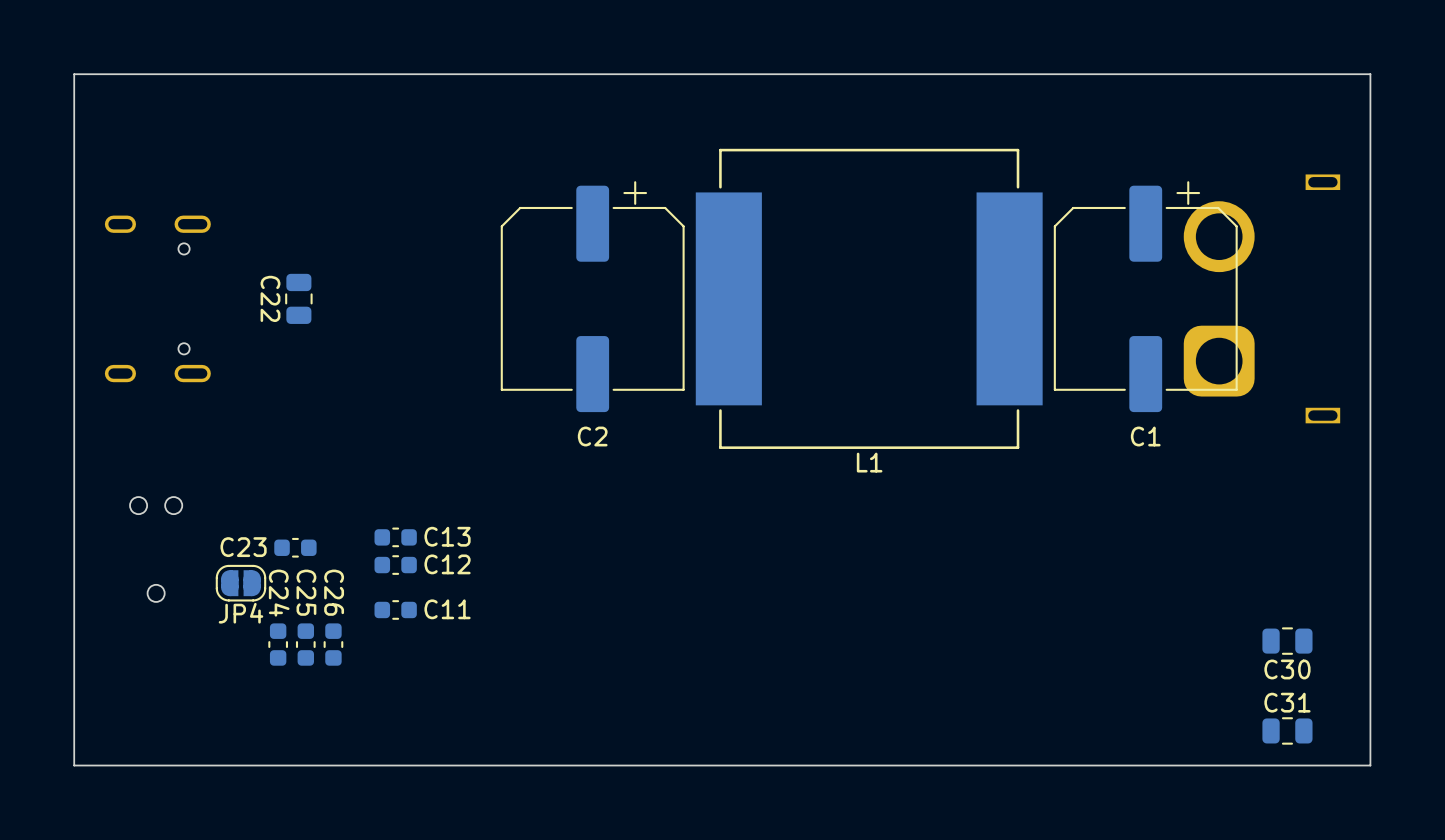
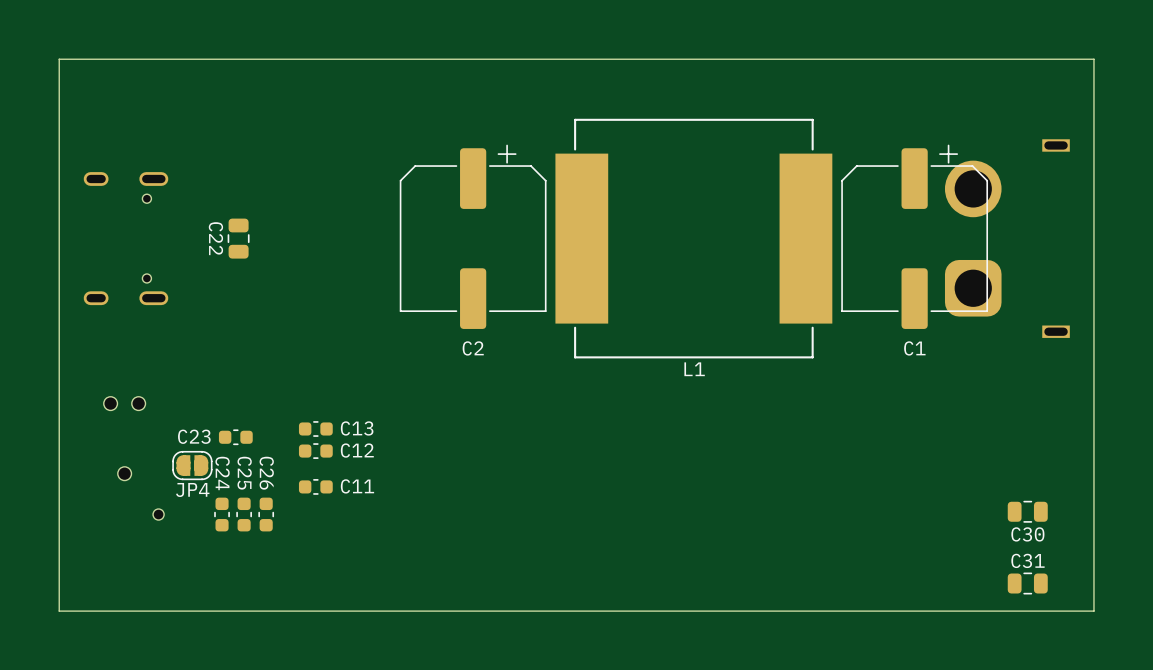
part: none -> (158, 514)

